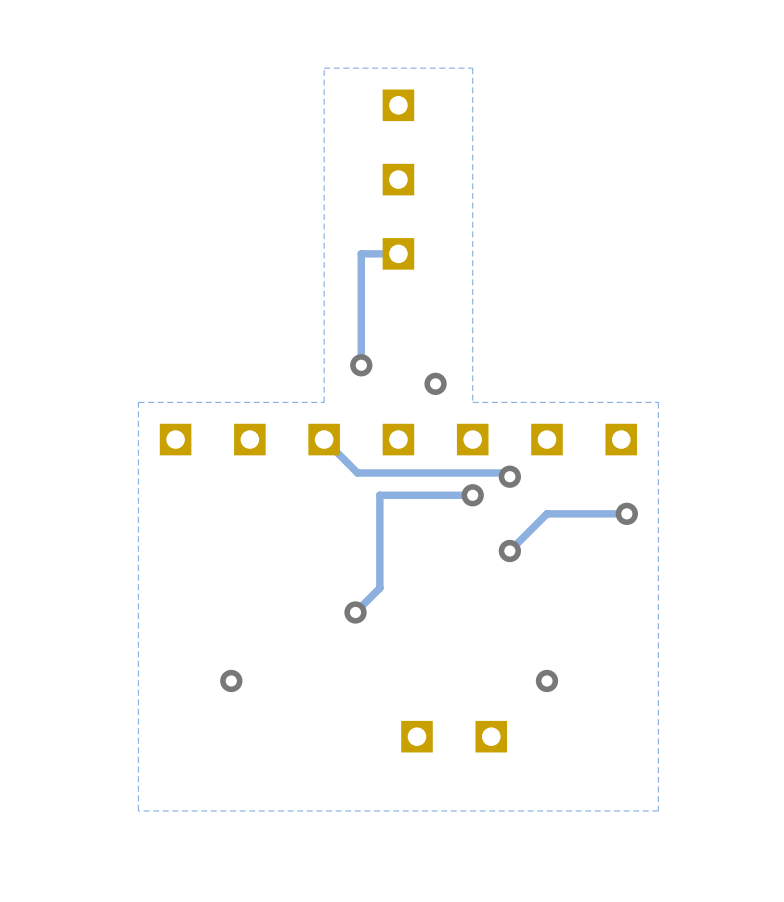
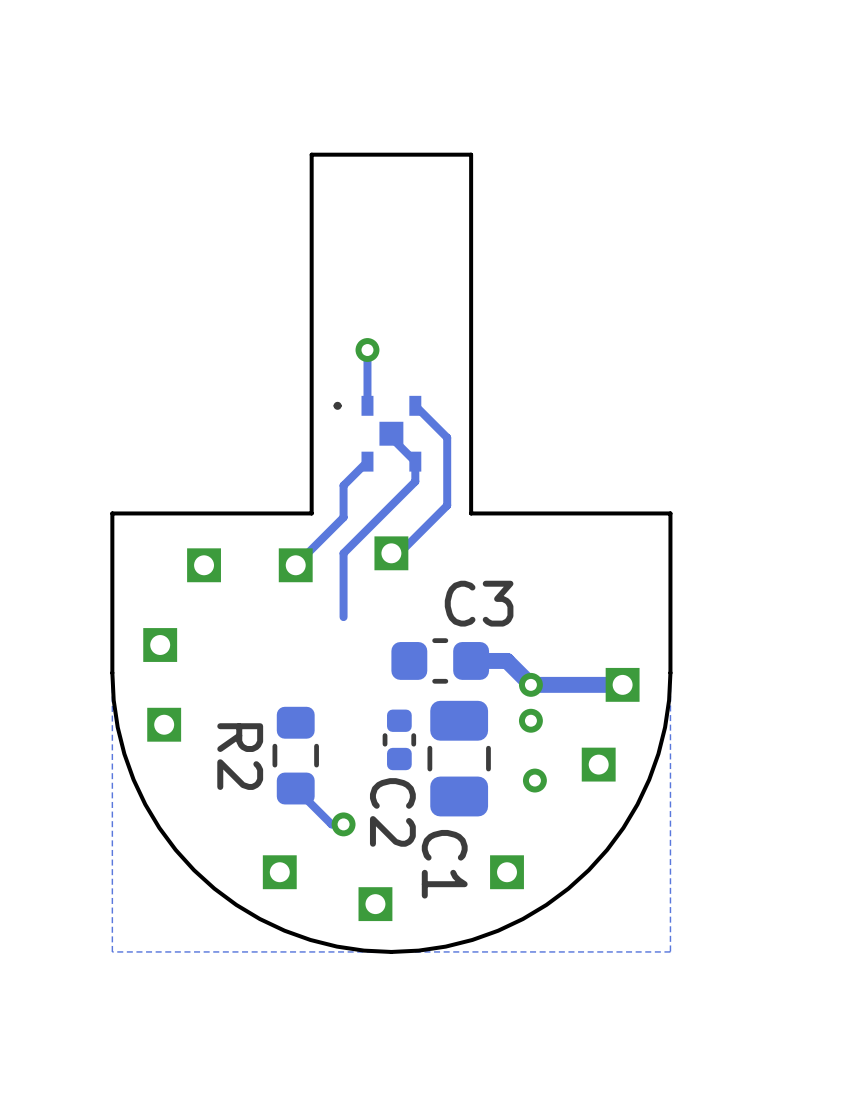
board edge: none -> (471, 154) (311, 154) (311, 513) (112, 513) (113, 700) (124, 753) (145, 804) (175, 849) (214, 888) (236, 904) (284, 930) (336, 946) (391, 951) (445, 946) (498, 930) (546, 904) (588, 870) (623, 827) (649, 779) (665, 727) (670, 672) (670, 513) (471, 513) (471, 154)
part: (398, 105) -> none
part: (398, 179) -> none
track: none -> (367, 350) (367, 405)
via: none -> (367, 350)
track: (398, 253) (361, 253) (361, 365) -> none
part: (398, 253) -> none
track: none -> (415, 405) (447, 437) (447, 505) (387, 565)
part: none -> (377, 433)
track: none -> (391, 433) (391, 437) (415, 461) (415, 481) (343, 553) (343, 617)
track: none -> (367, 461) (343, 485) (343, 517) (295, 565)
via: (361, 365) -> none
via: (435, 383) -> none
part: (175, 439) -> none
part: (249, 439) -> none
track: (324, 439) (357, 472) (506, 472) (509, 476) -> none
part position: (324, 439) -> (295, 565)
part: (472, 439) -> none
part: (546, 439) -> none
part: (621, 439) -> none
part: none -> (204, 565)
via: (509, 476) -> none
track: (472, 495) (379, 495) (379, 588) (355, 612) -> none
via: (472, 495) -> none
track: (626, 513) (546, 513) (509, 550) -> none
via: (626, 513) -> none
part: none -> (160, 645)
C3: none -> (440, 660)
track: none -> (471, 660) (507, 660) (530, 684) (622, 684)
via position: (509, 550) -> (530, 684)
part: none -> (622, 684)
via: none -> (530, 720)
part: none -> (164, 724)
via: (355, 612) -> none
C2: none -> (399, 739)
R2: none -> (295, 755)
C1: none -> (459, 758)
part: none -> (598, 764)
track: none -> (295, 788) (331, 824) (343, 824)
via: (231, 680) -> none
via position: (546, 680) -> (534, 780)
via: none -> (343, 824)
part: none -> (279, 872)
part position: (416, 736) -> (375, 904)
part position: (491, 736) -> (507, 872)

